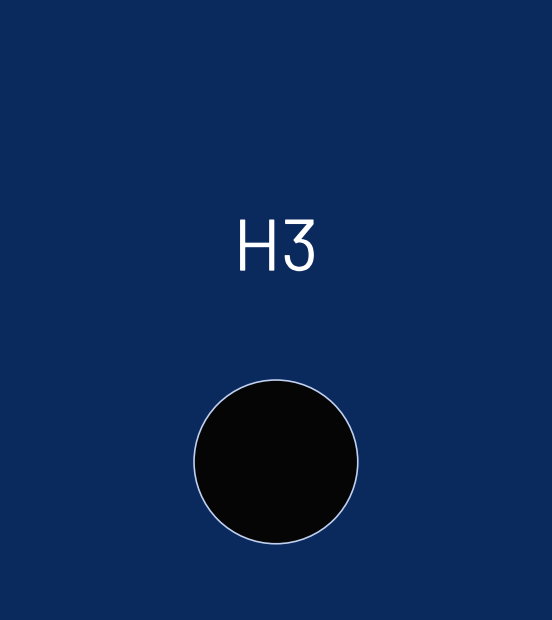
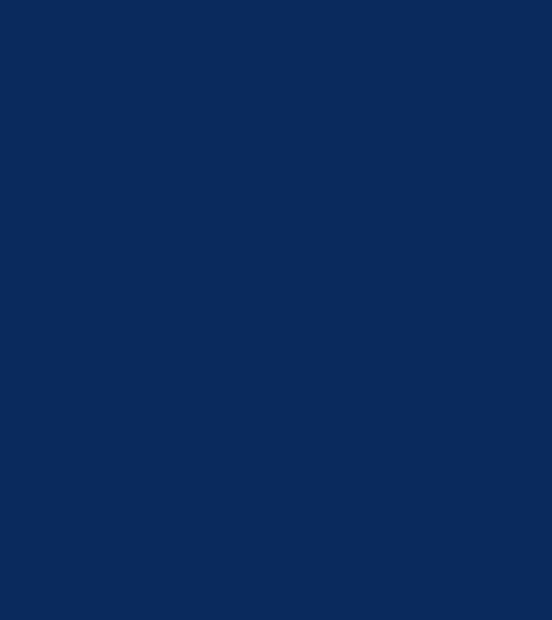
H3: (275, 461) -> none

